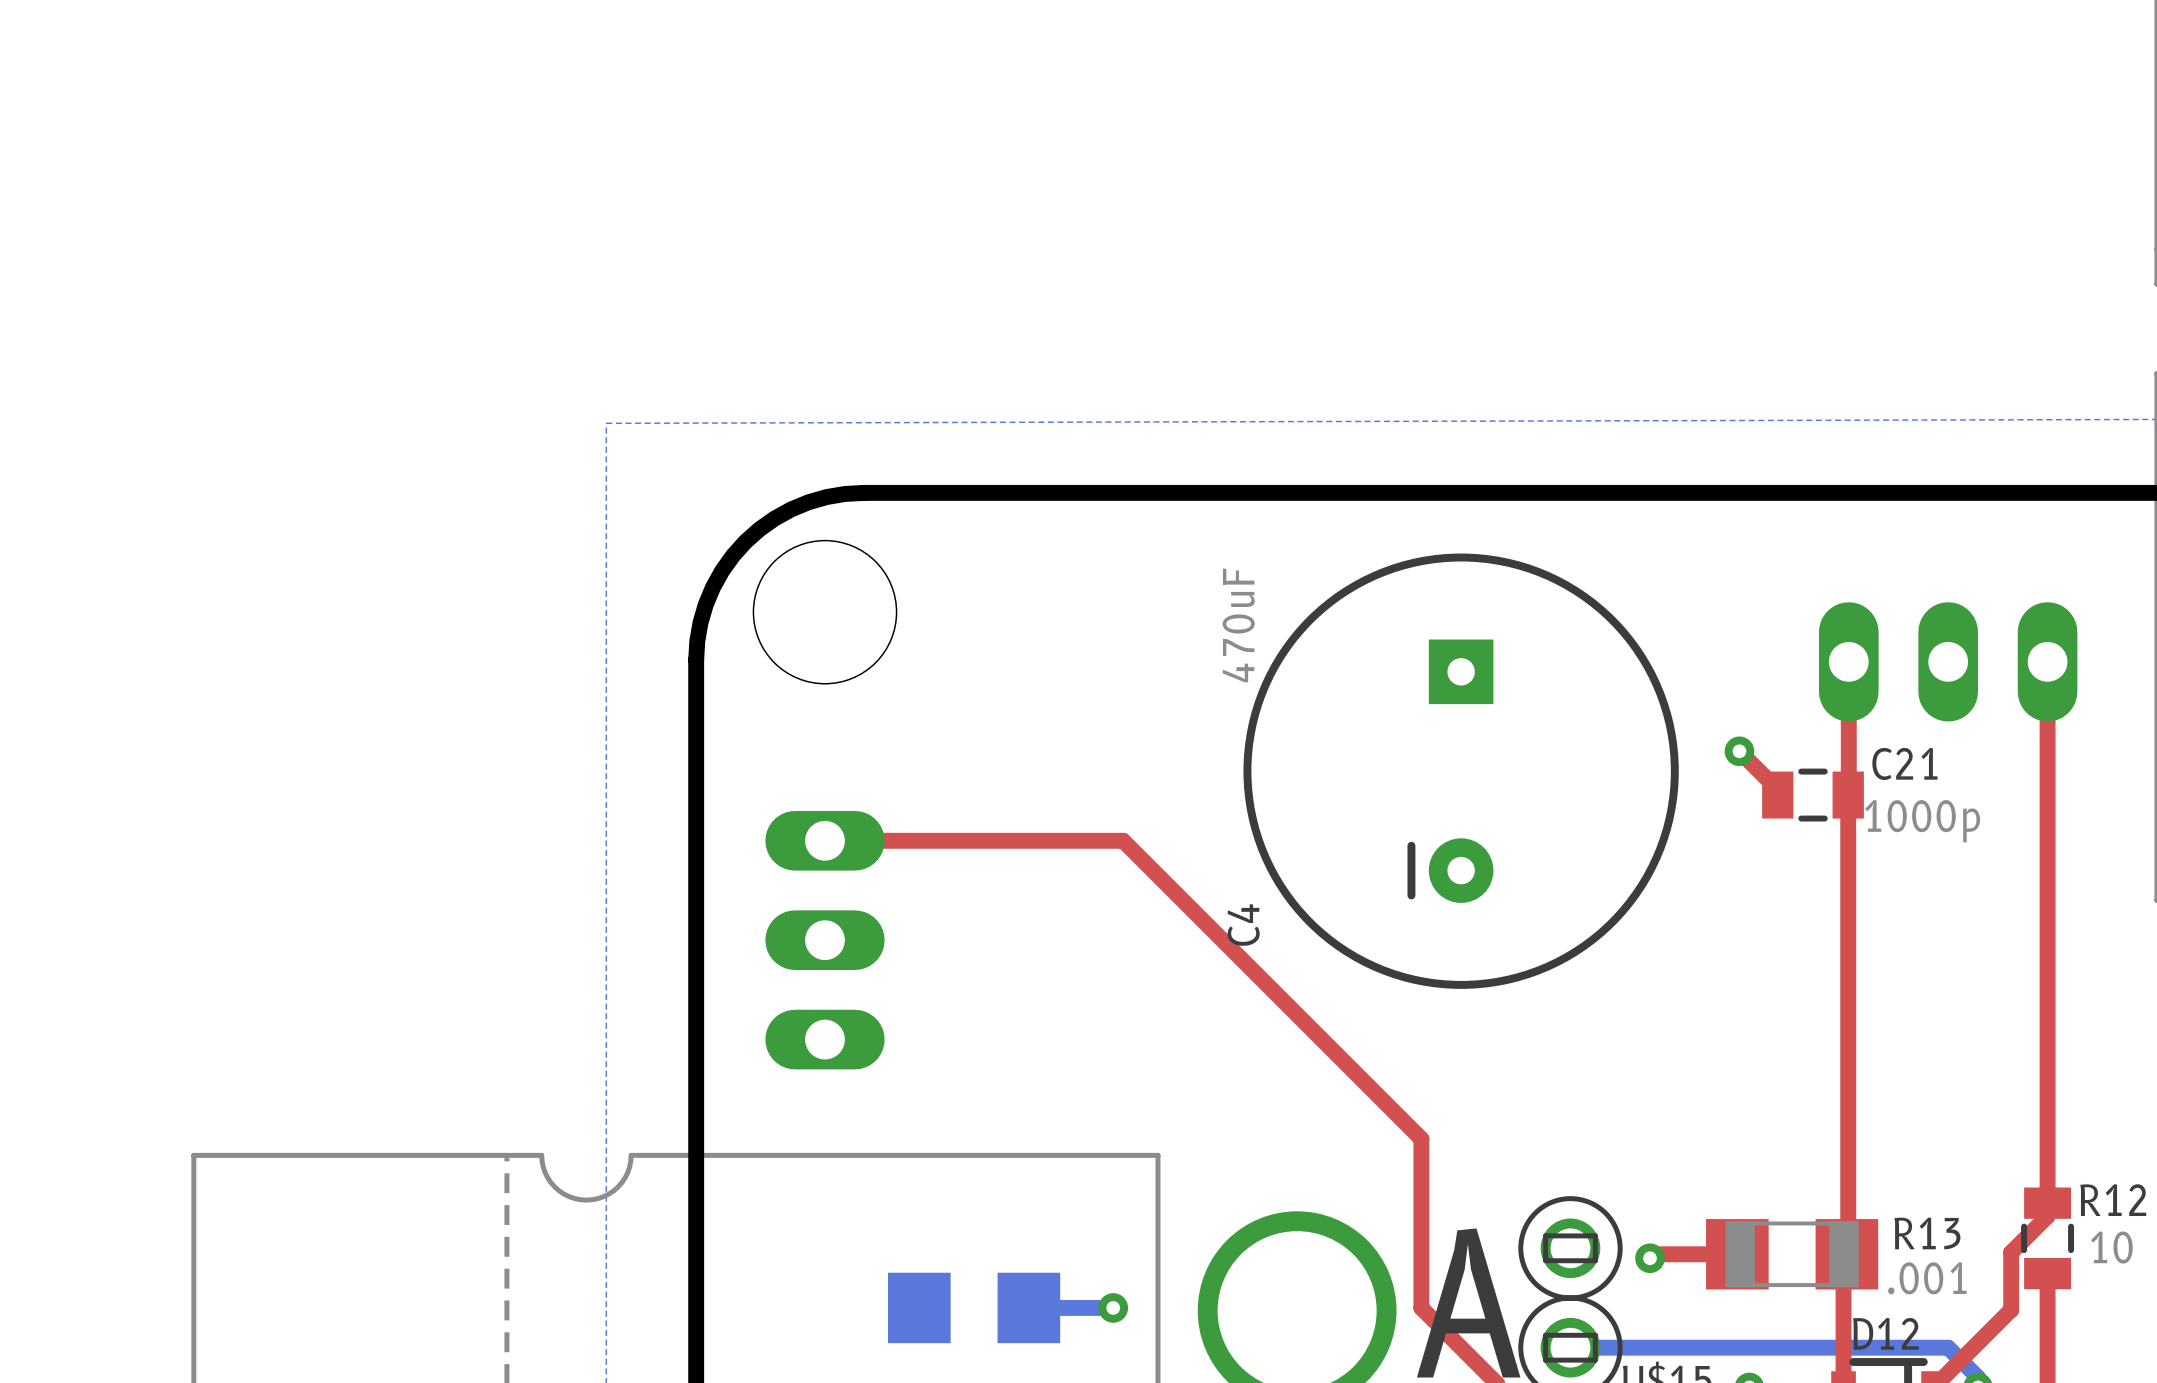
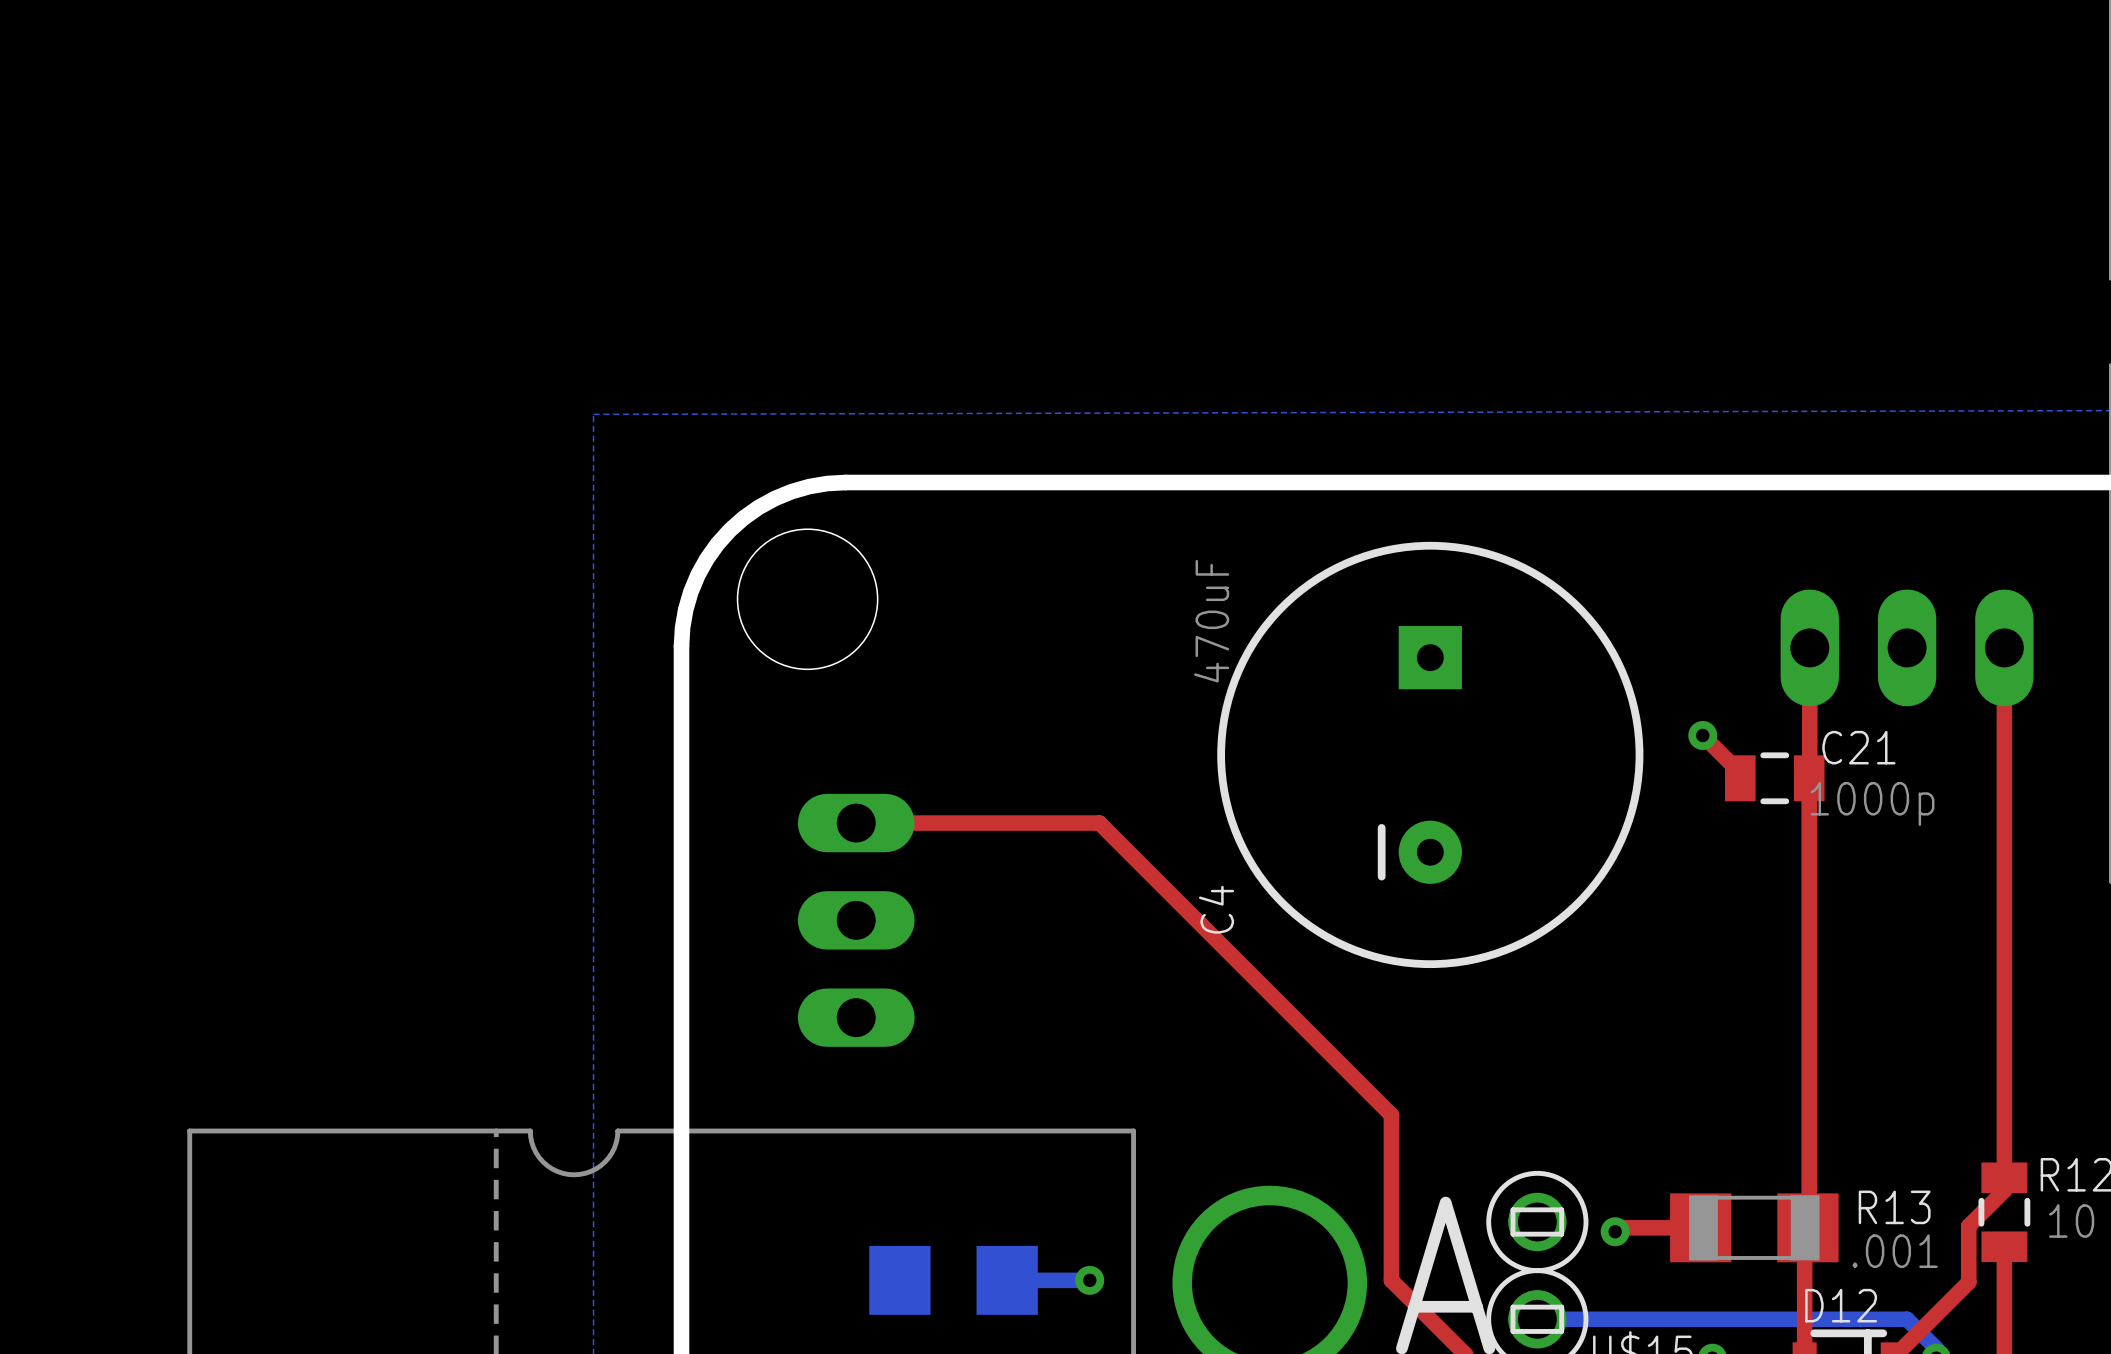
part position: (824, 940) -> (856, 920)

